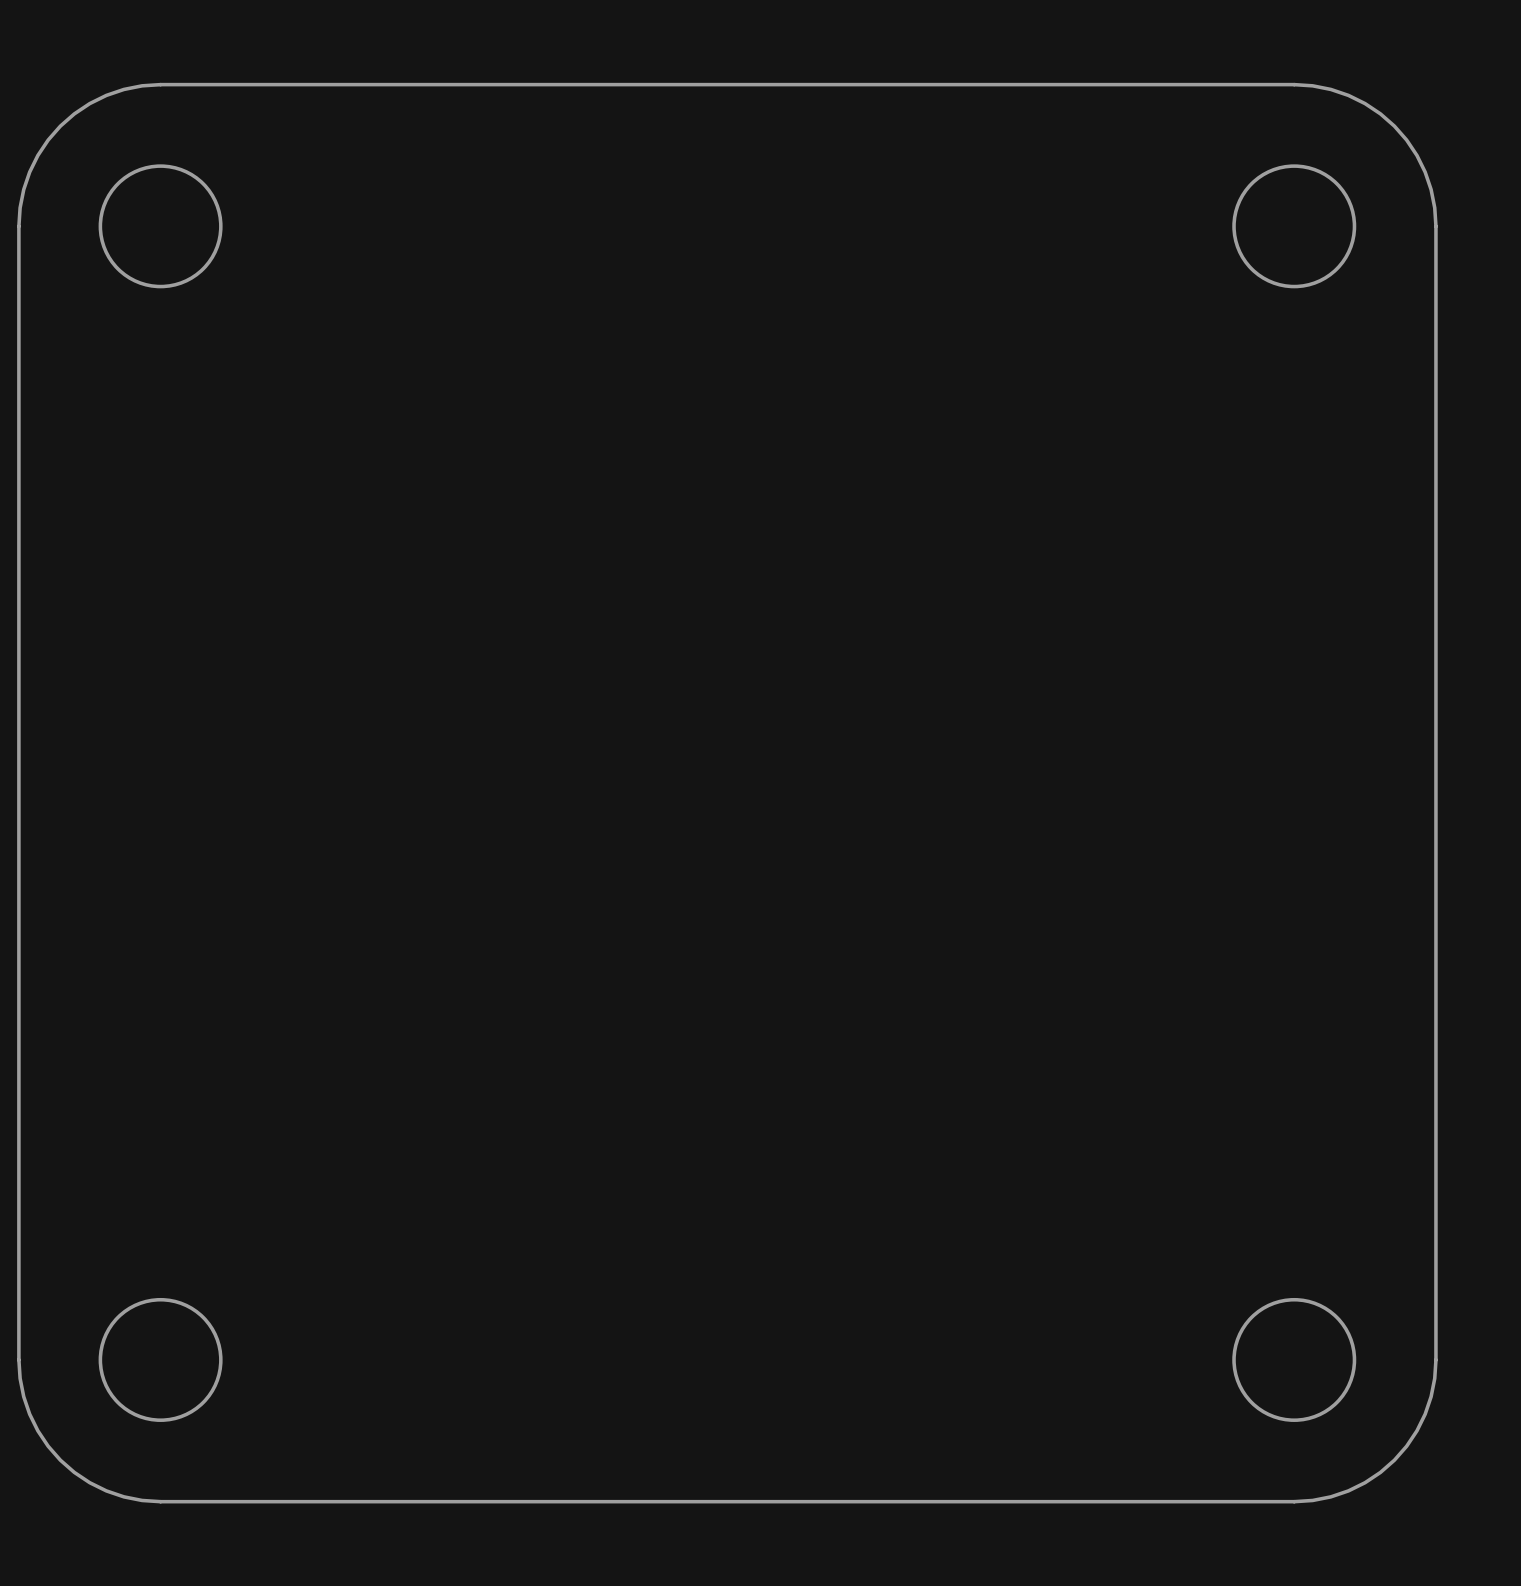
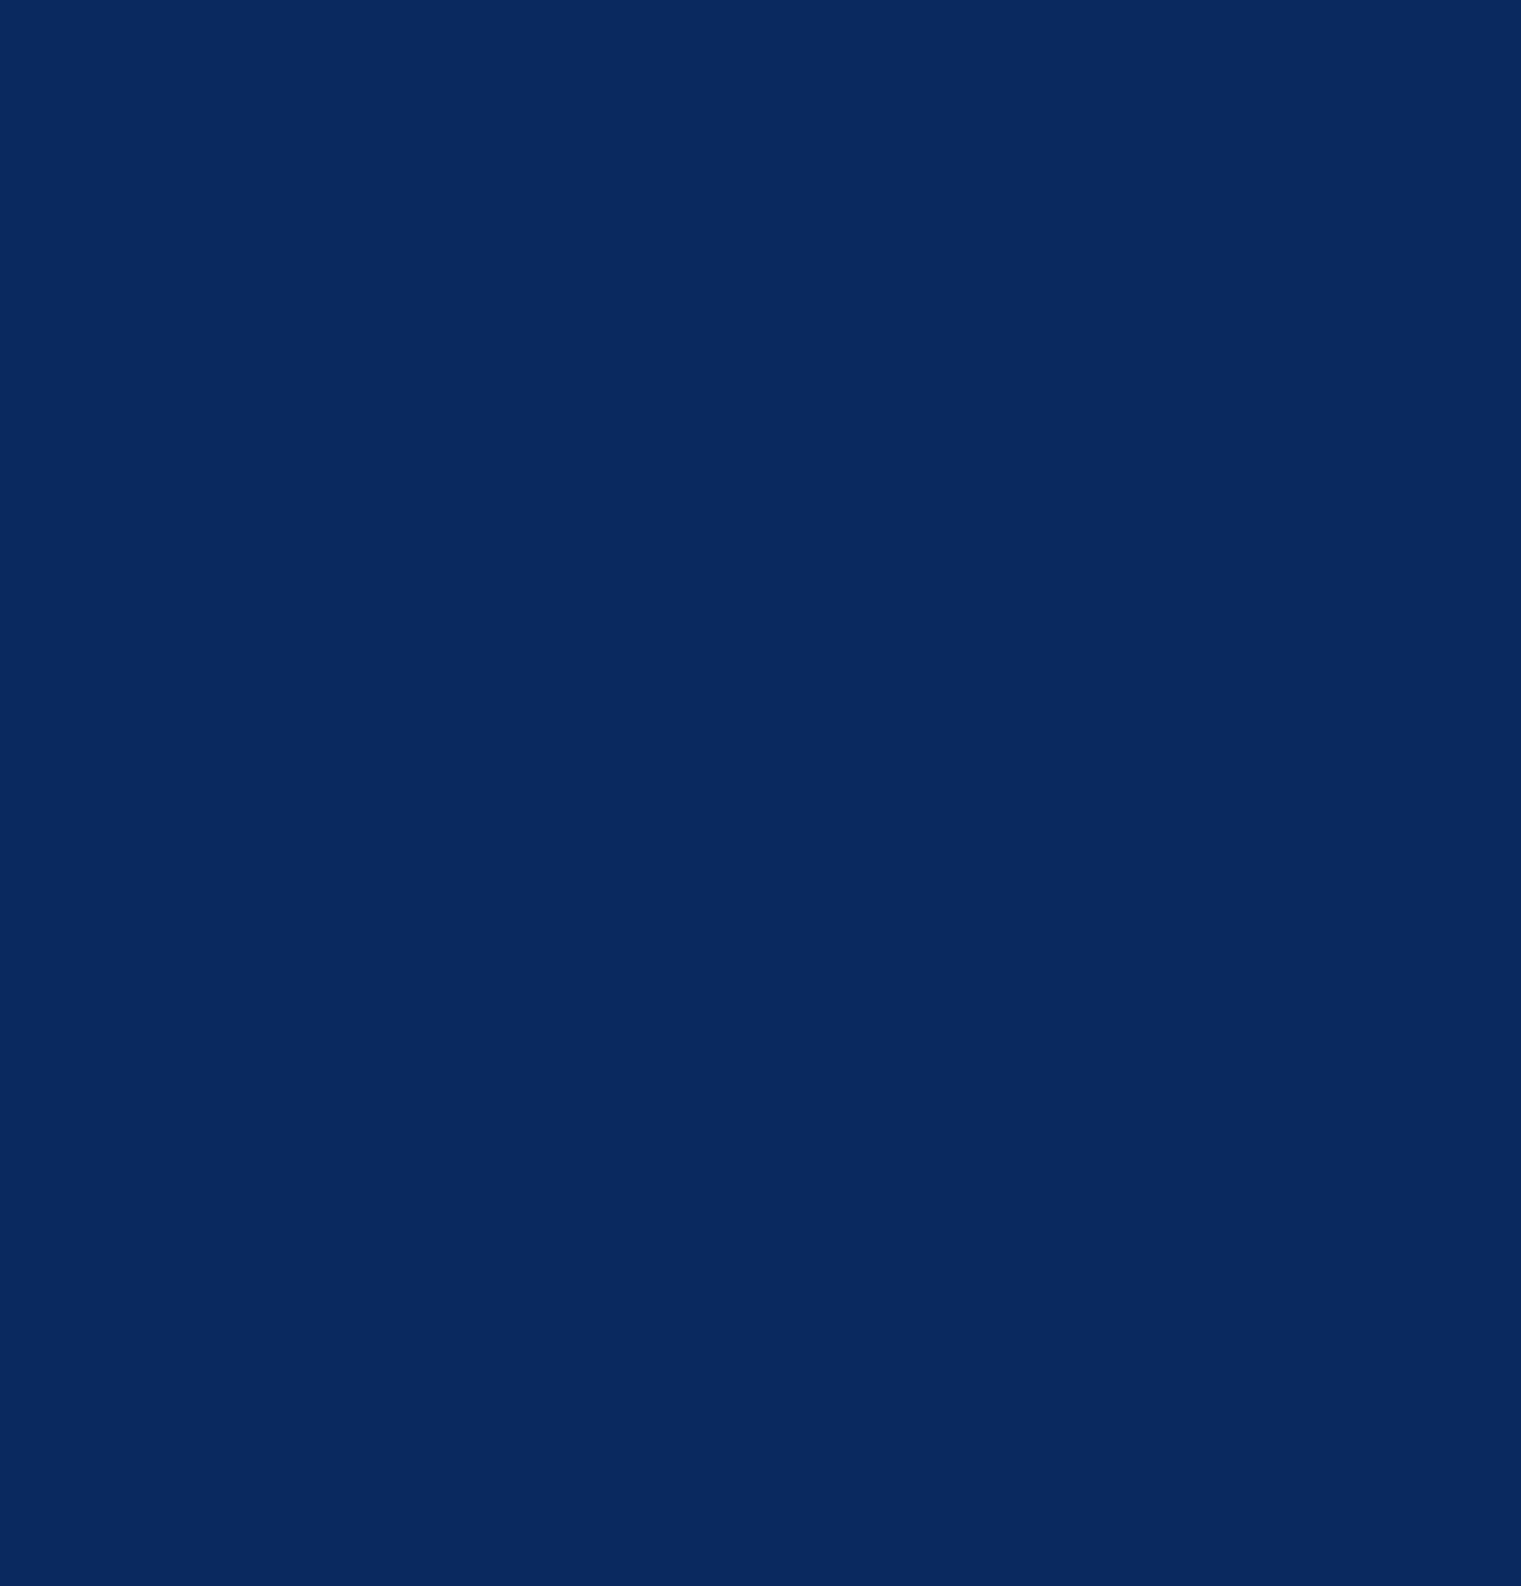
board edge: (1294, 84) (160, 84) (123, 89) (106, 95) (89, 103) (60, 126) (37, 155) (29, 172) (20, 207) (18, 226) (18, 1359) (23, 1396) (29, 1414) (37, 1430) (60, 1460) (74, 1472) (106, 1490) (123, 1496) (160, 1501) (1294, 1501) (1330, 1496) (1348, 1490) (1380, 1472) (1394, 1460) (1406, 1446) (1425, 1414) (1431, 1396) (1435, 1359) (1434, 207) (1425, 172) (1416, 155) (1394, 126) (1380, 113) (1348, 95) (1330, 89) (1294, 84) -> none
round board edge: [98, 164, 223, 289] -> none
round board edge: [1232, 164, 1357, 289] -> none
round board edge: [98, 1297, 223, 1422] -> none
round board edge: [1232, 1297, 1357, 1422] -> none

